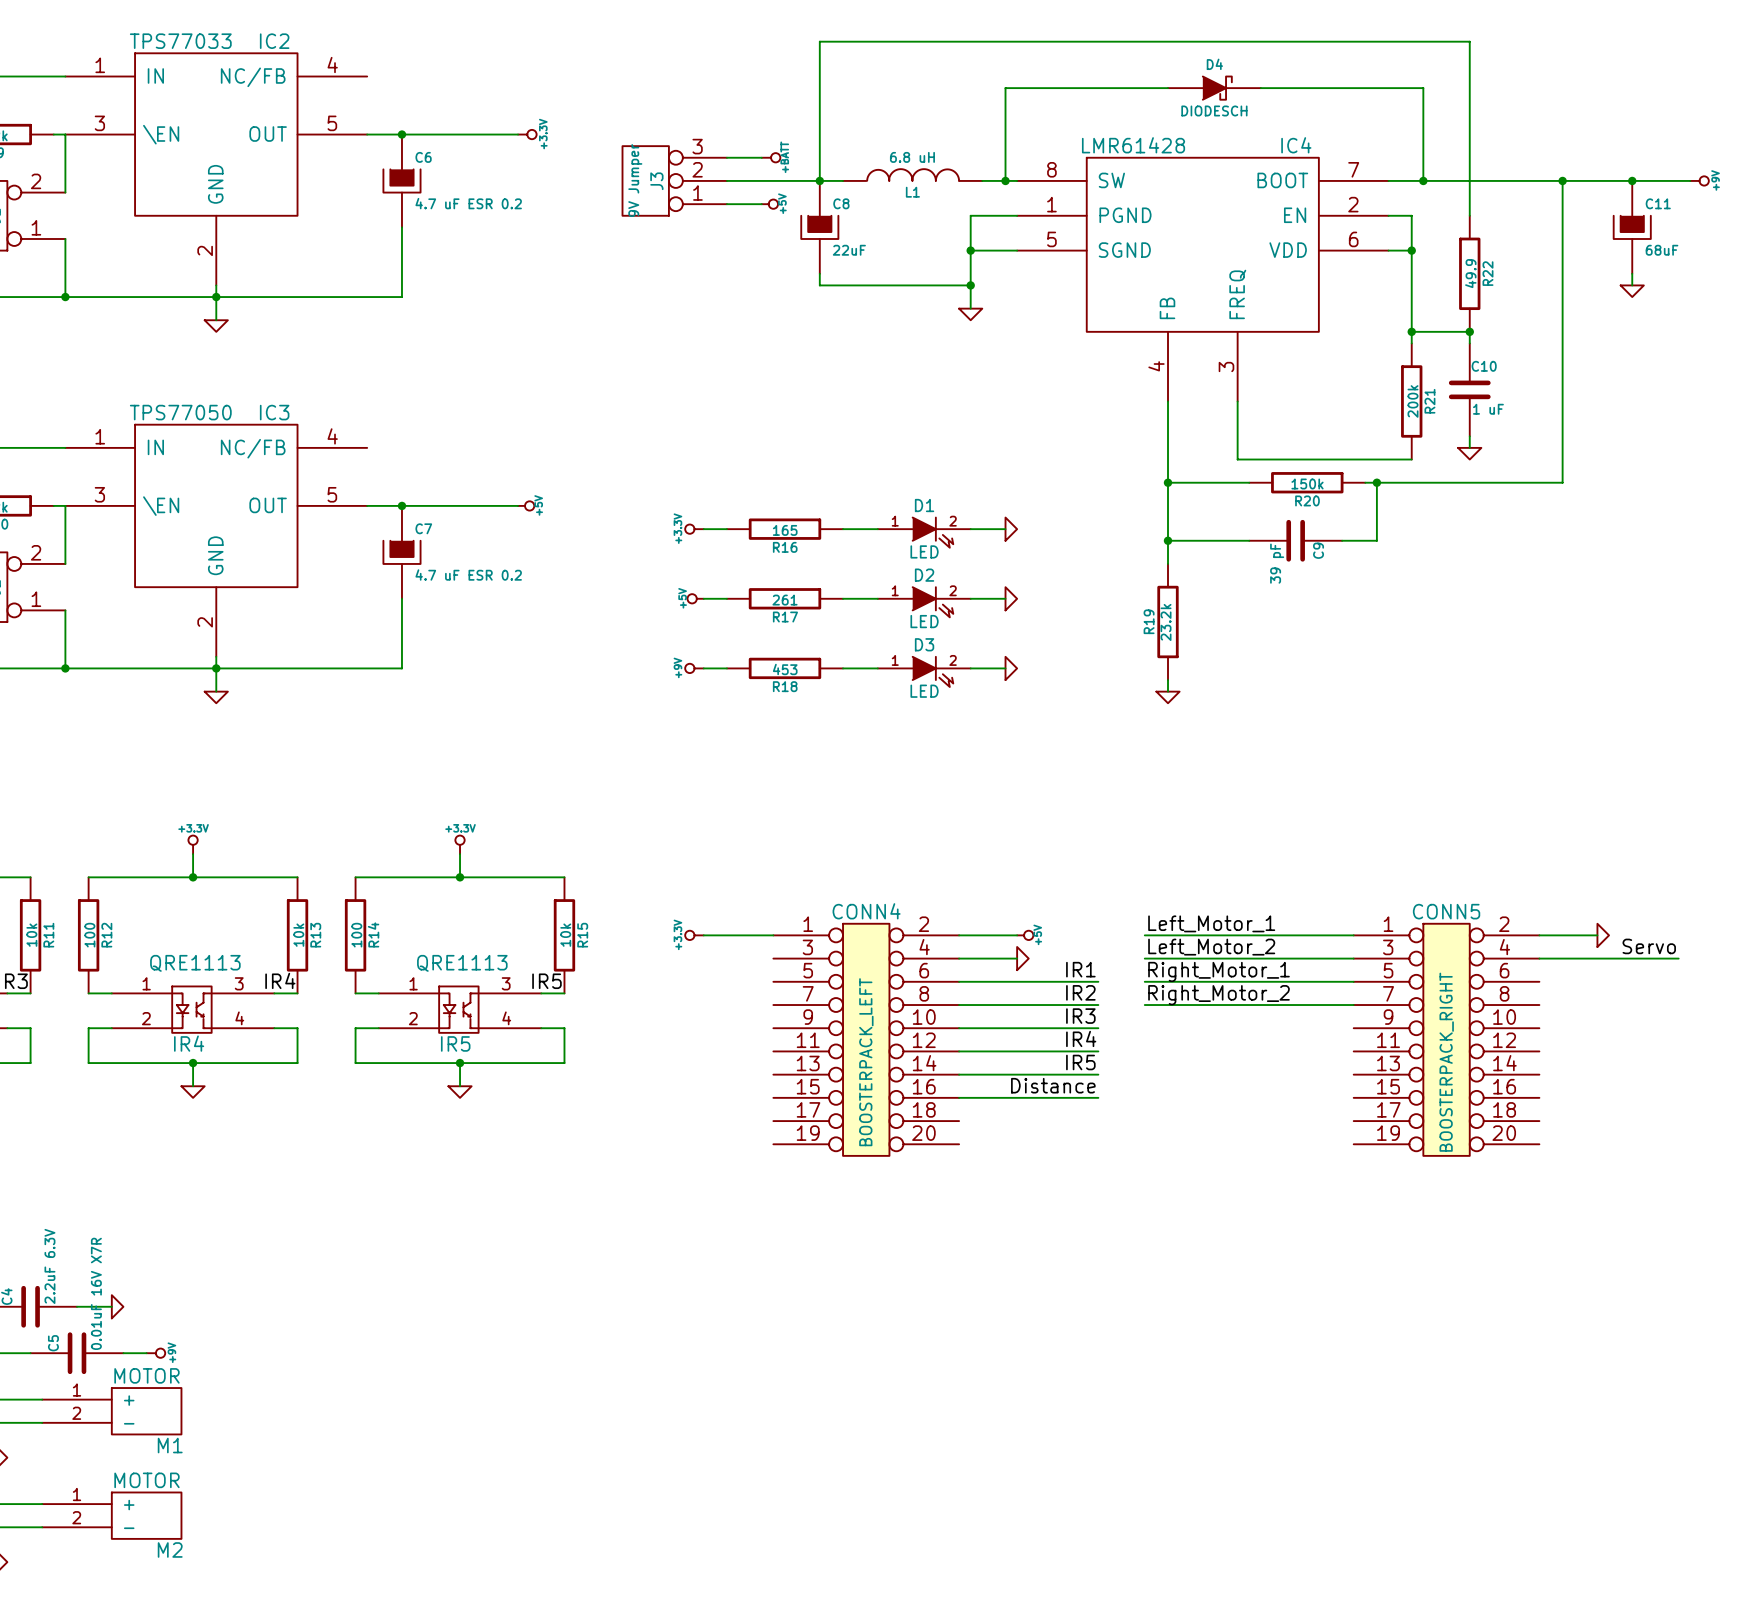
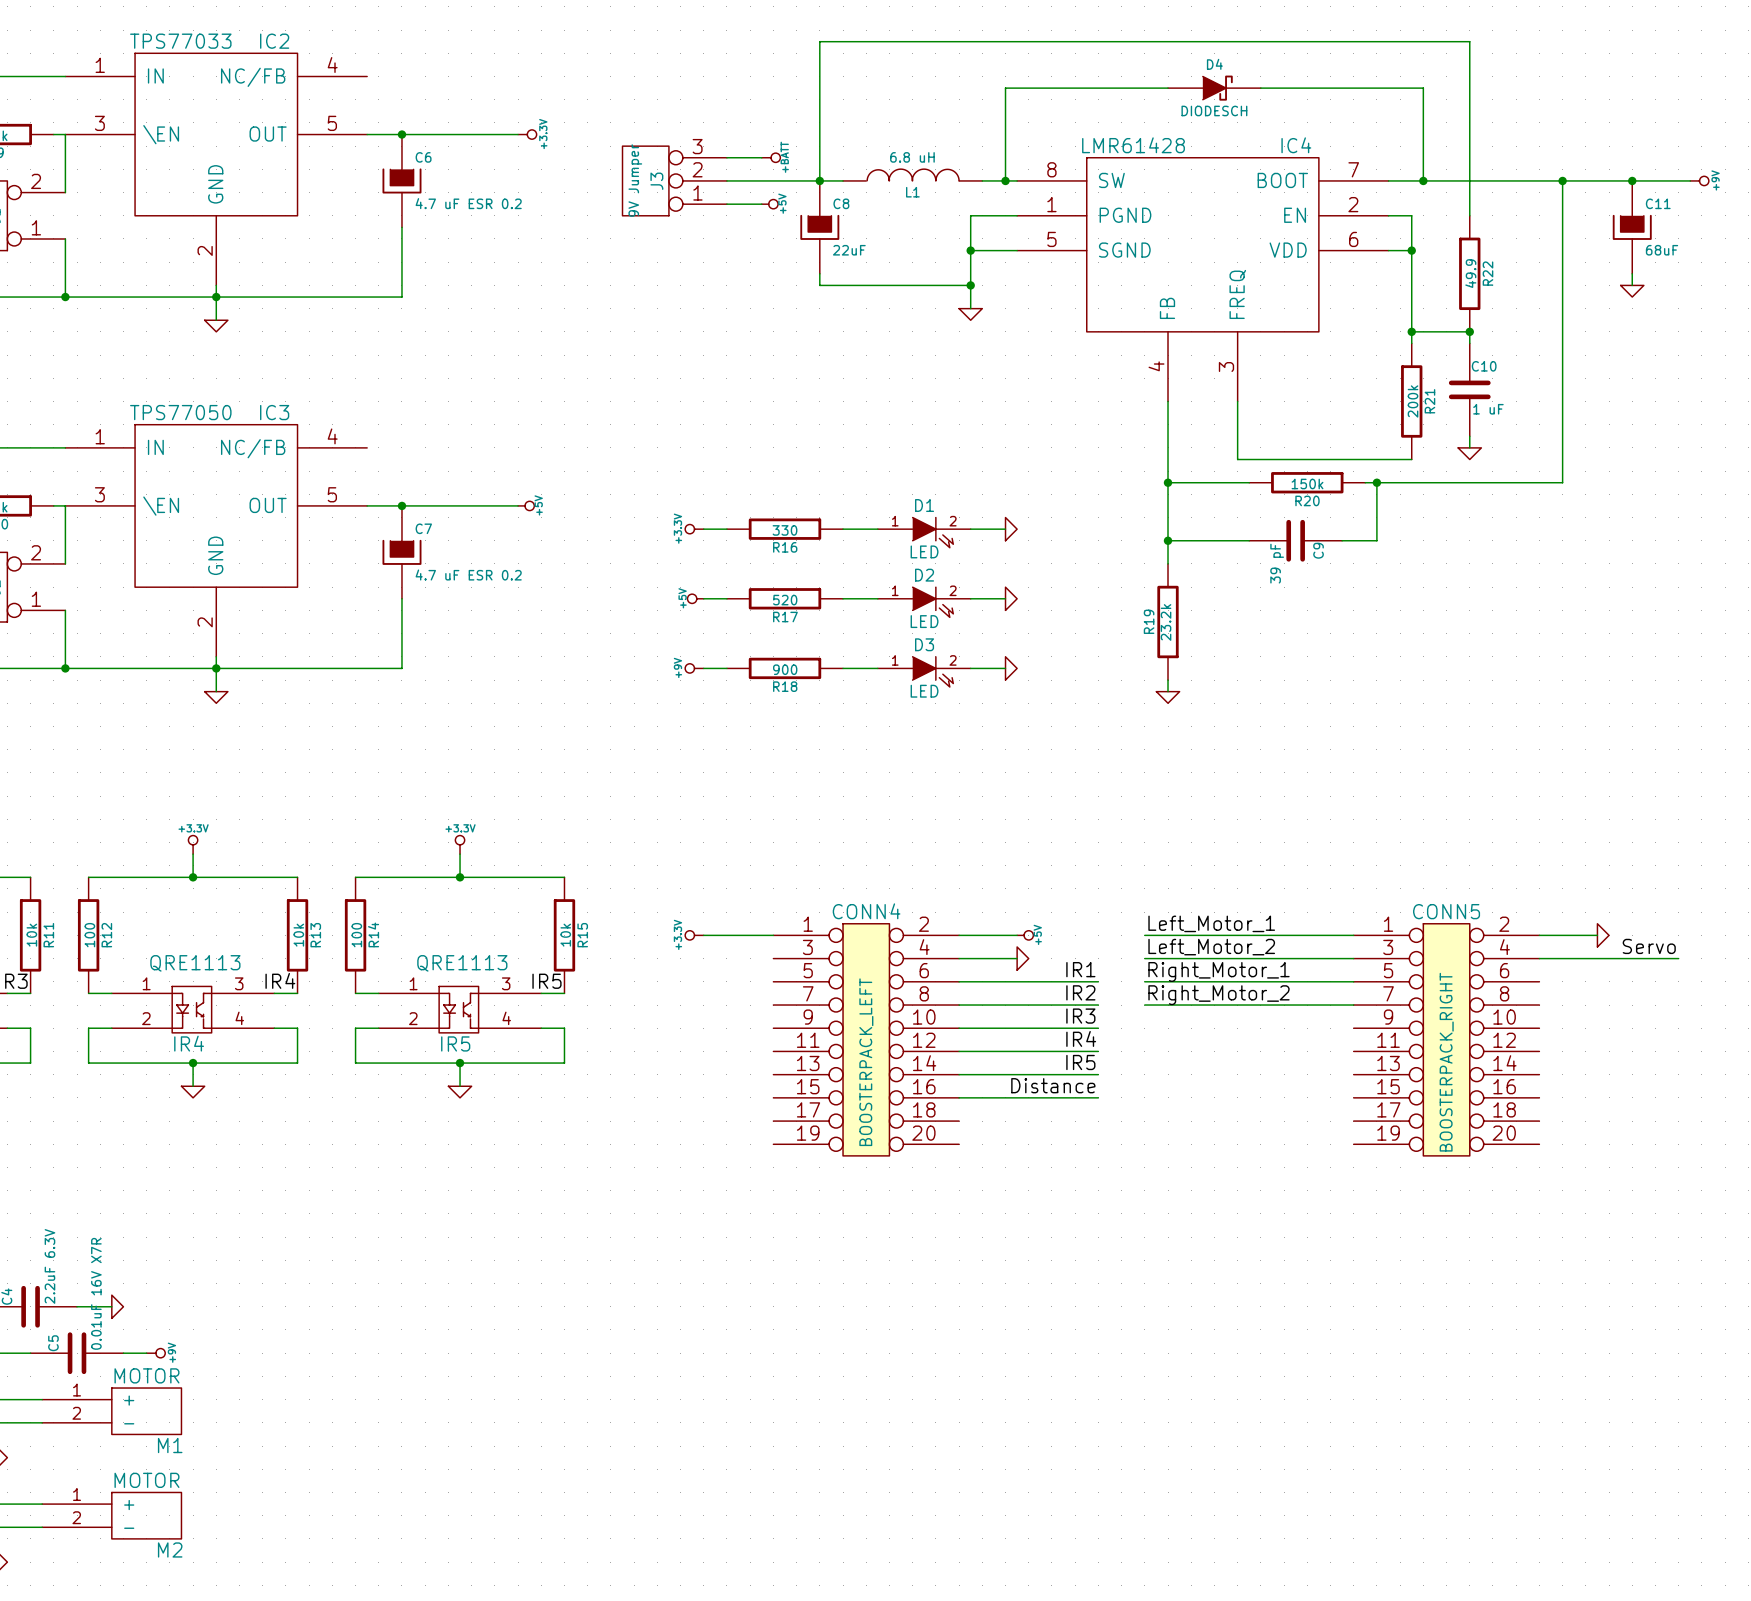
R16 value: 165 (785, 530) -> 330 (785, 530)
R17 value: 261 (785, 600) -> 520 (785, 600)
R18 value: 453 (785, 669) -> 900 (785, 669)

